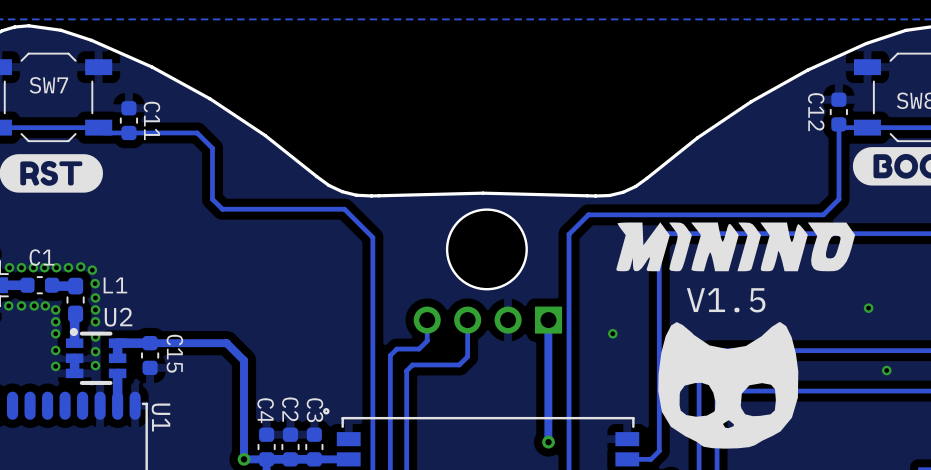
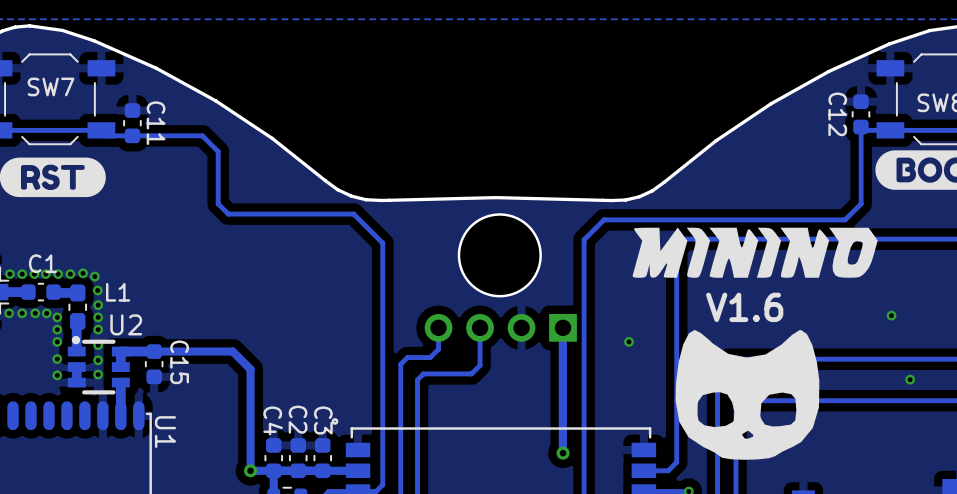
text: V1.5 (726, 300) -> V1.6 (744, 307)

